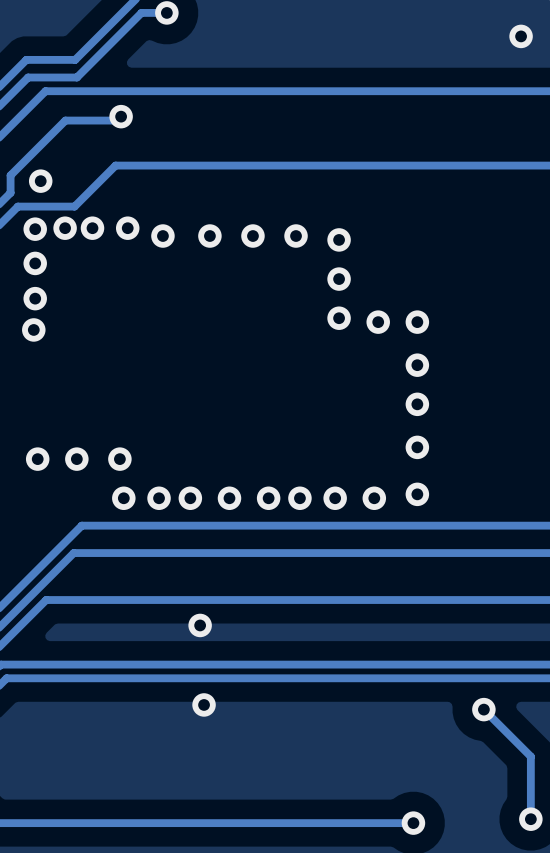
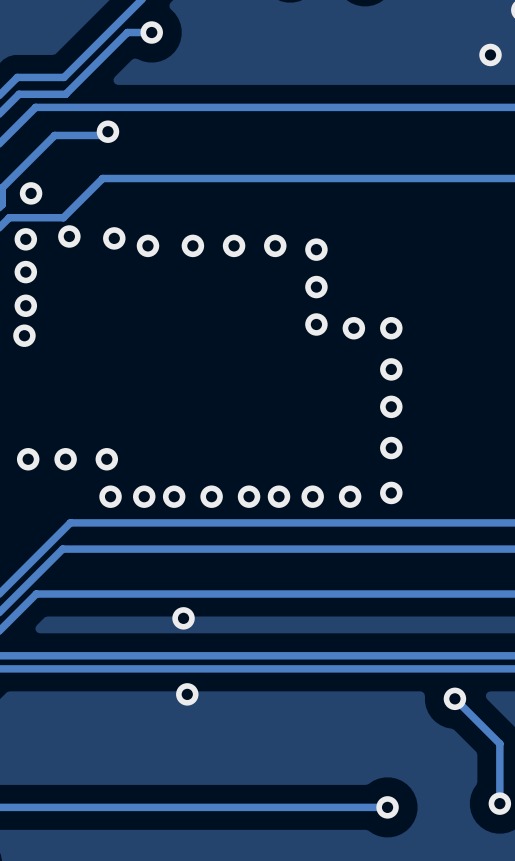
via: none -> (69, 236)
via: (65, 228) -> none
via: (92, 228) -> none

